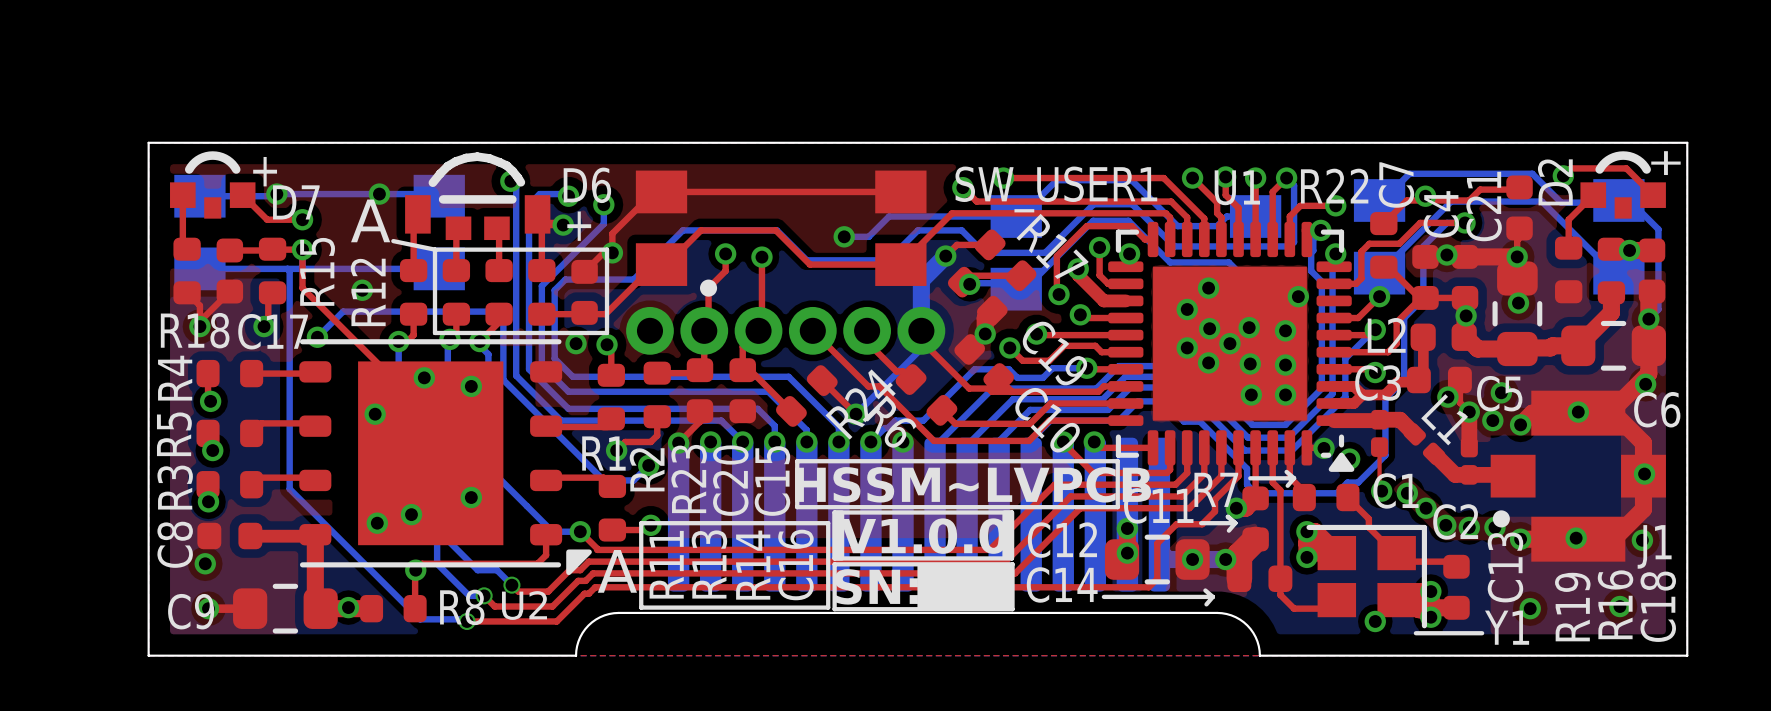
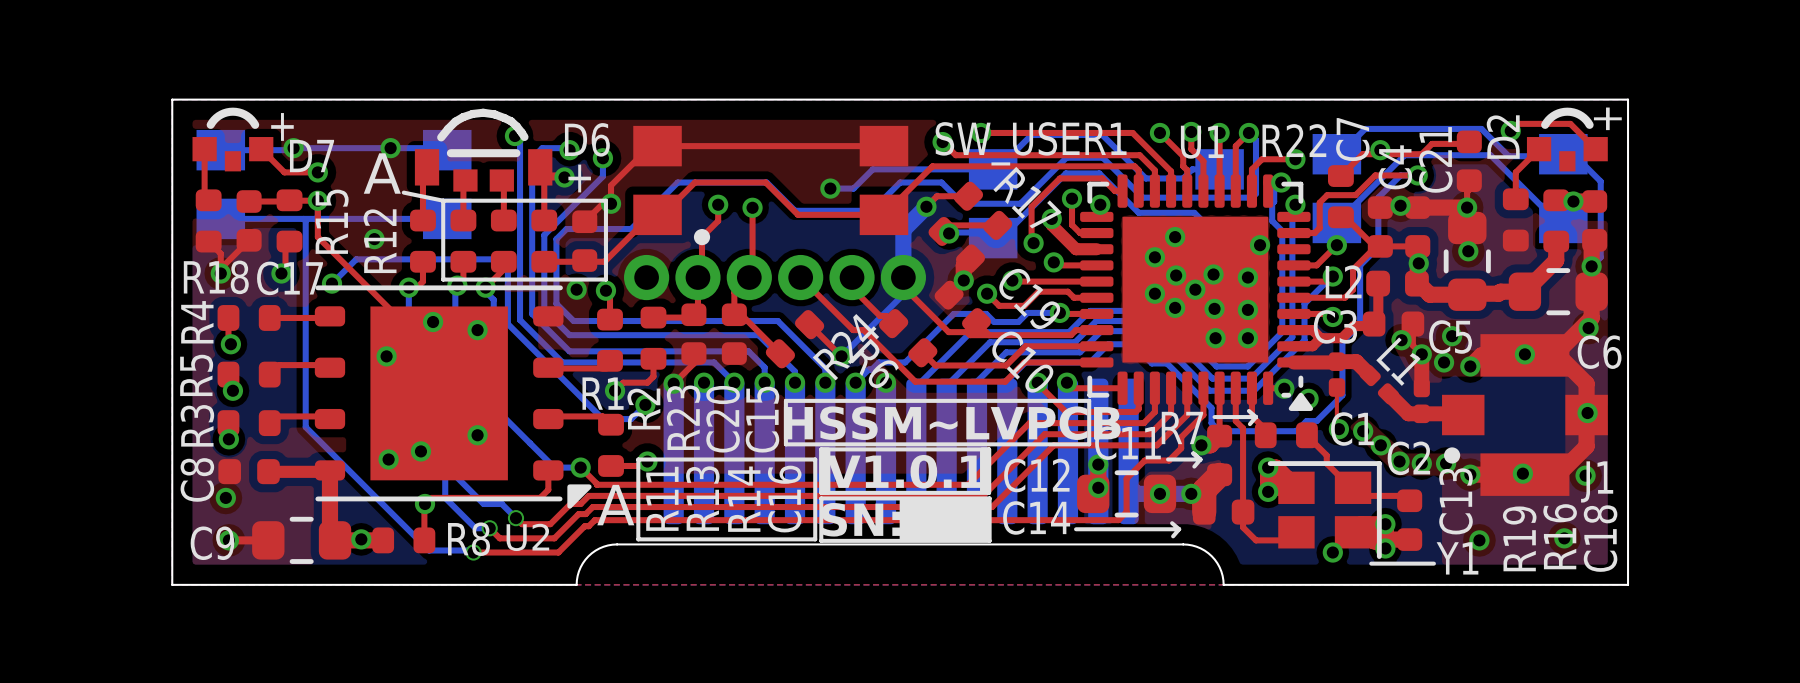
text: V1.0.0 (923, 536) -> V1.0.1 (905, 471)

